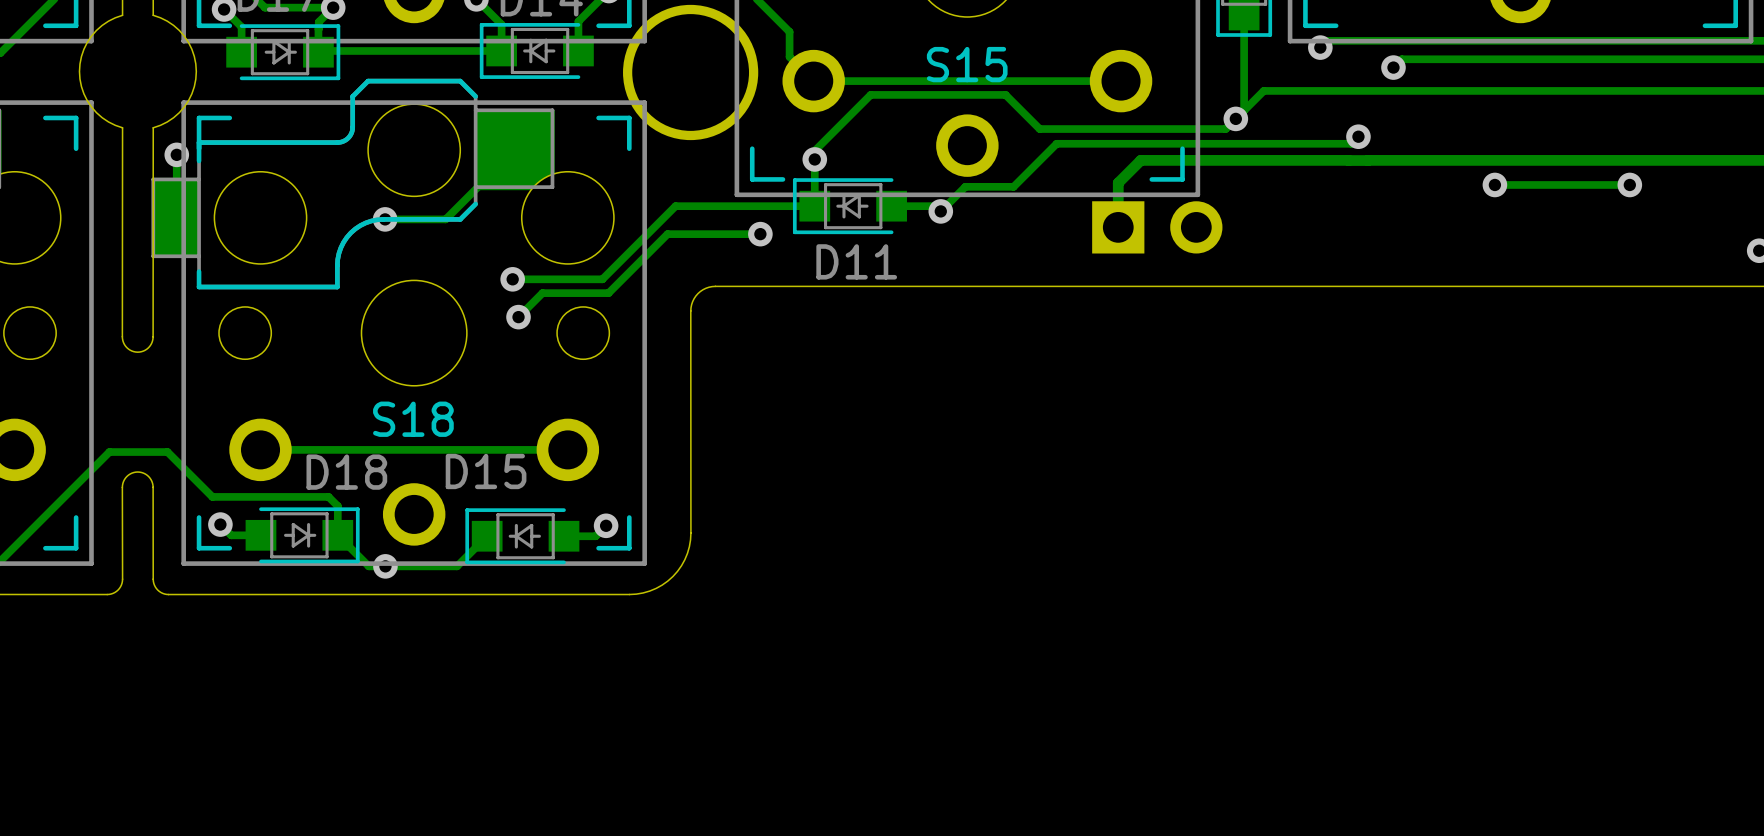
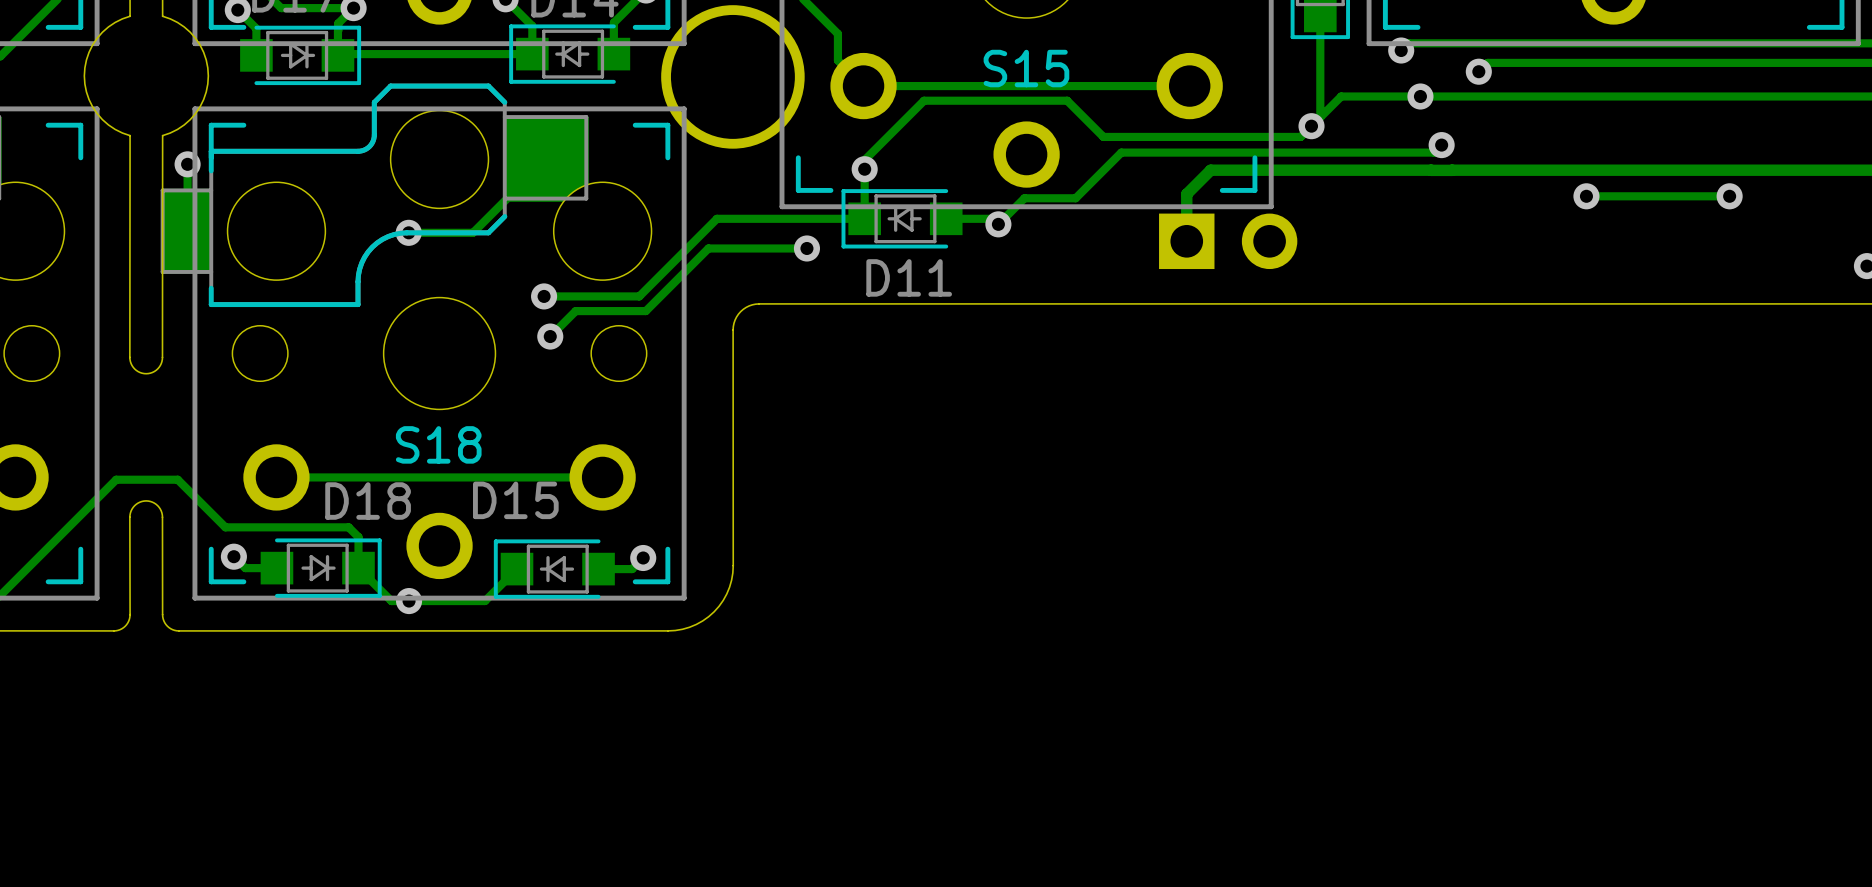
via: none -> (1420, 96)

